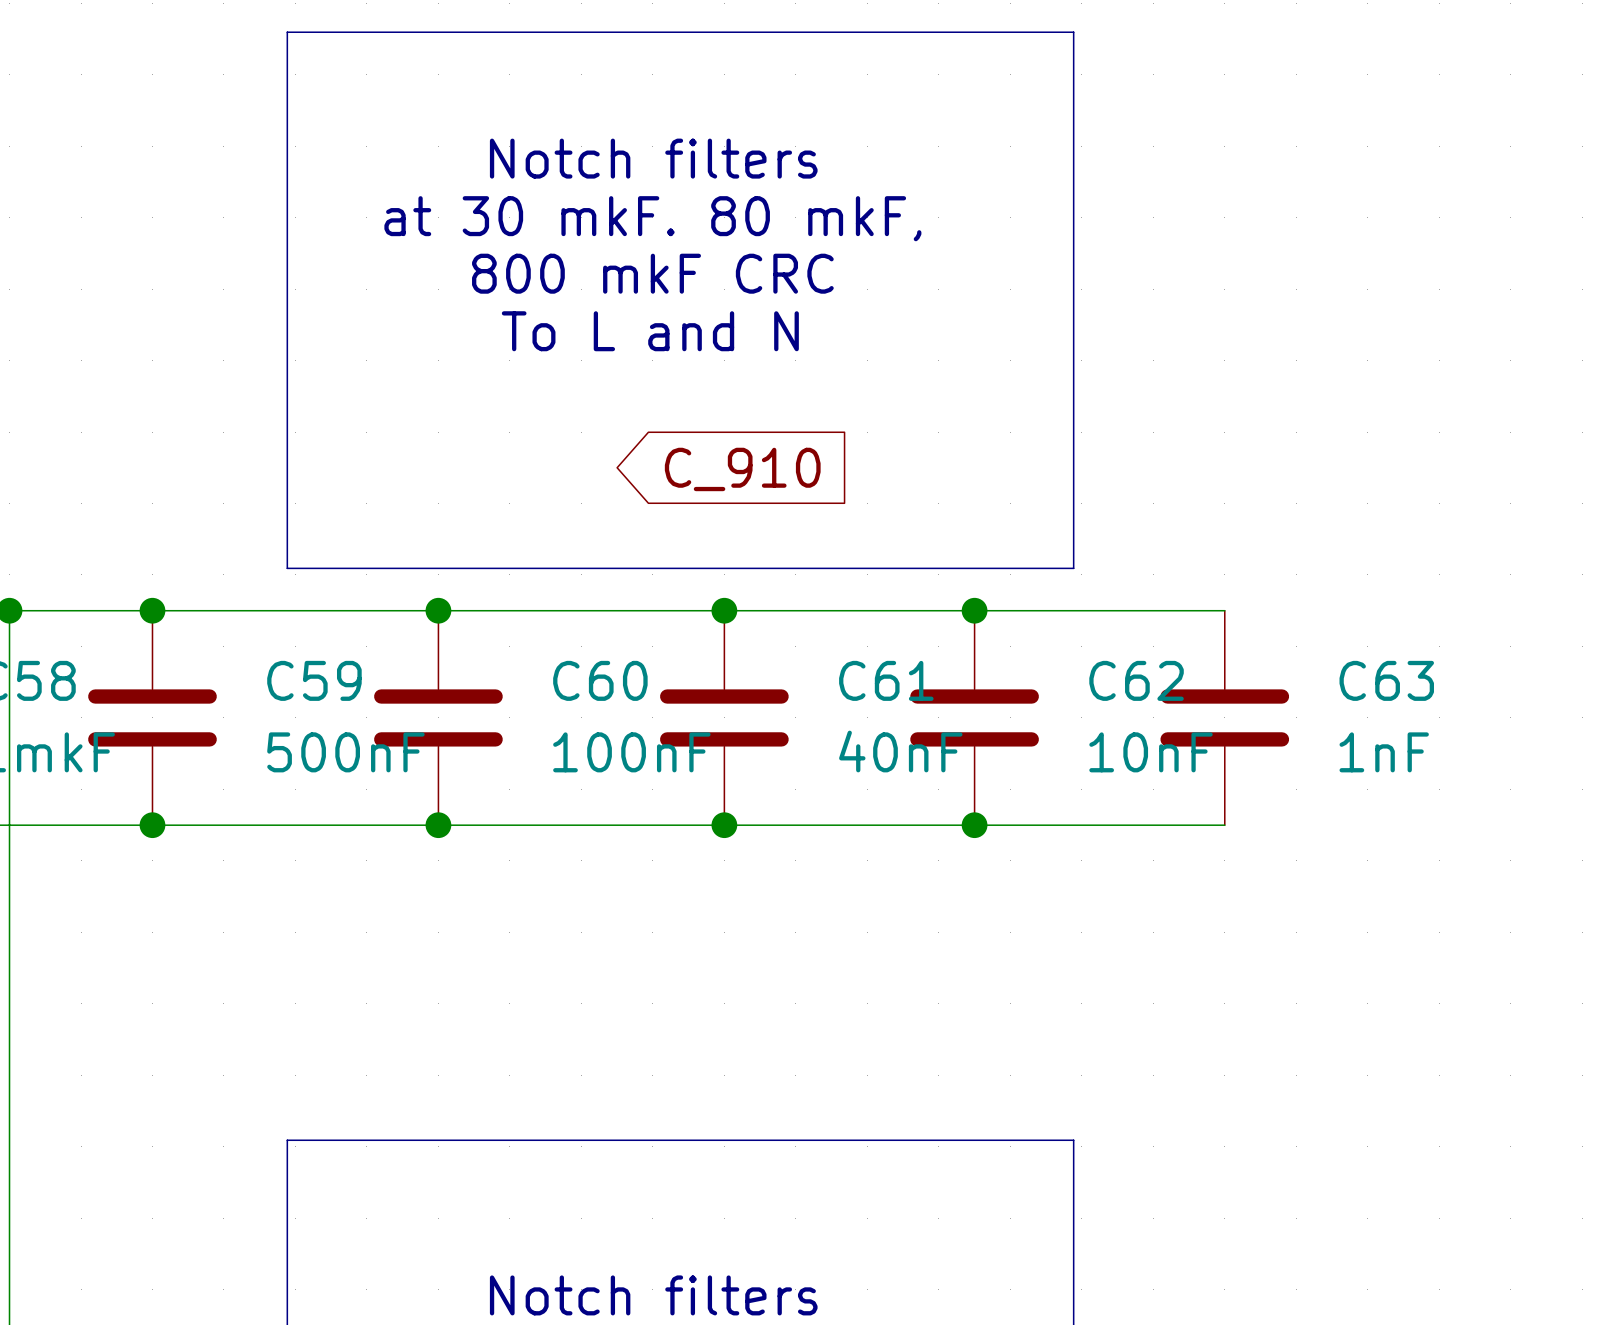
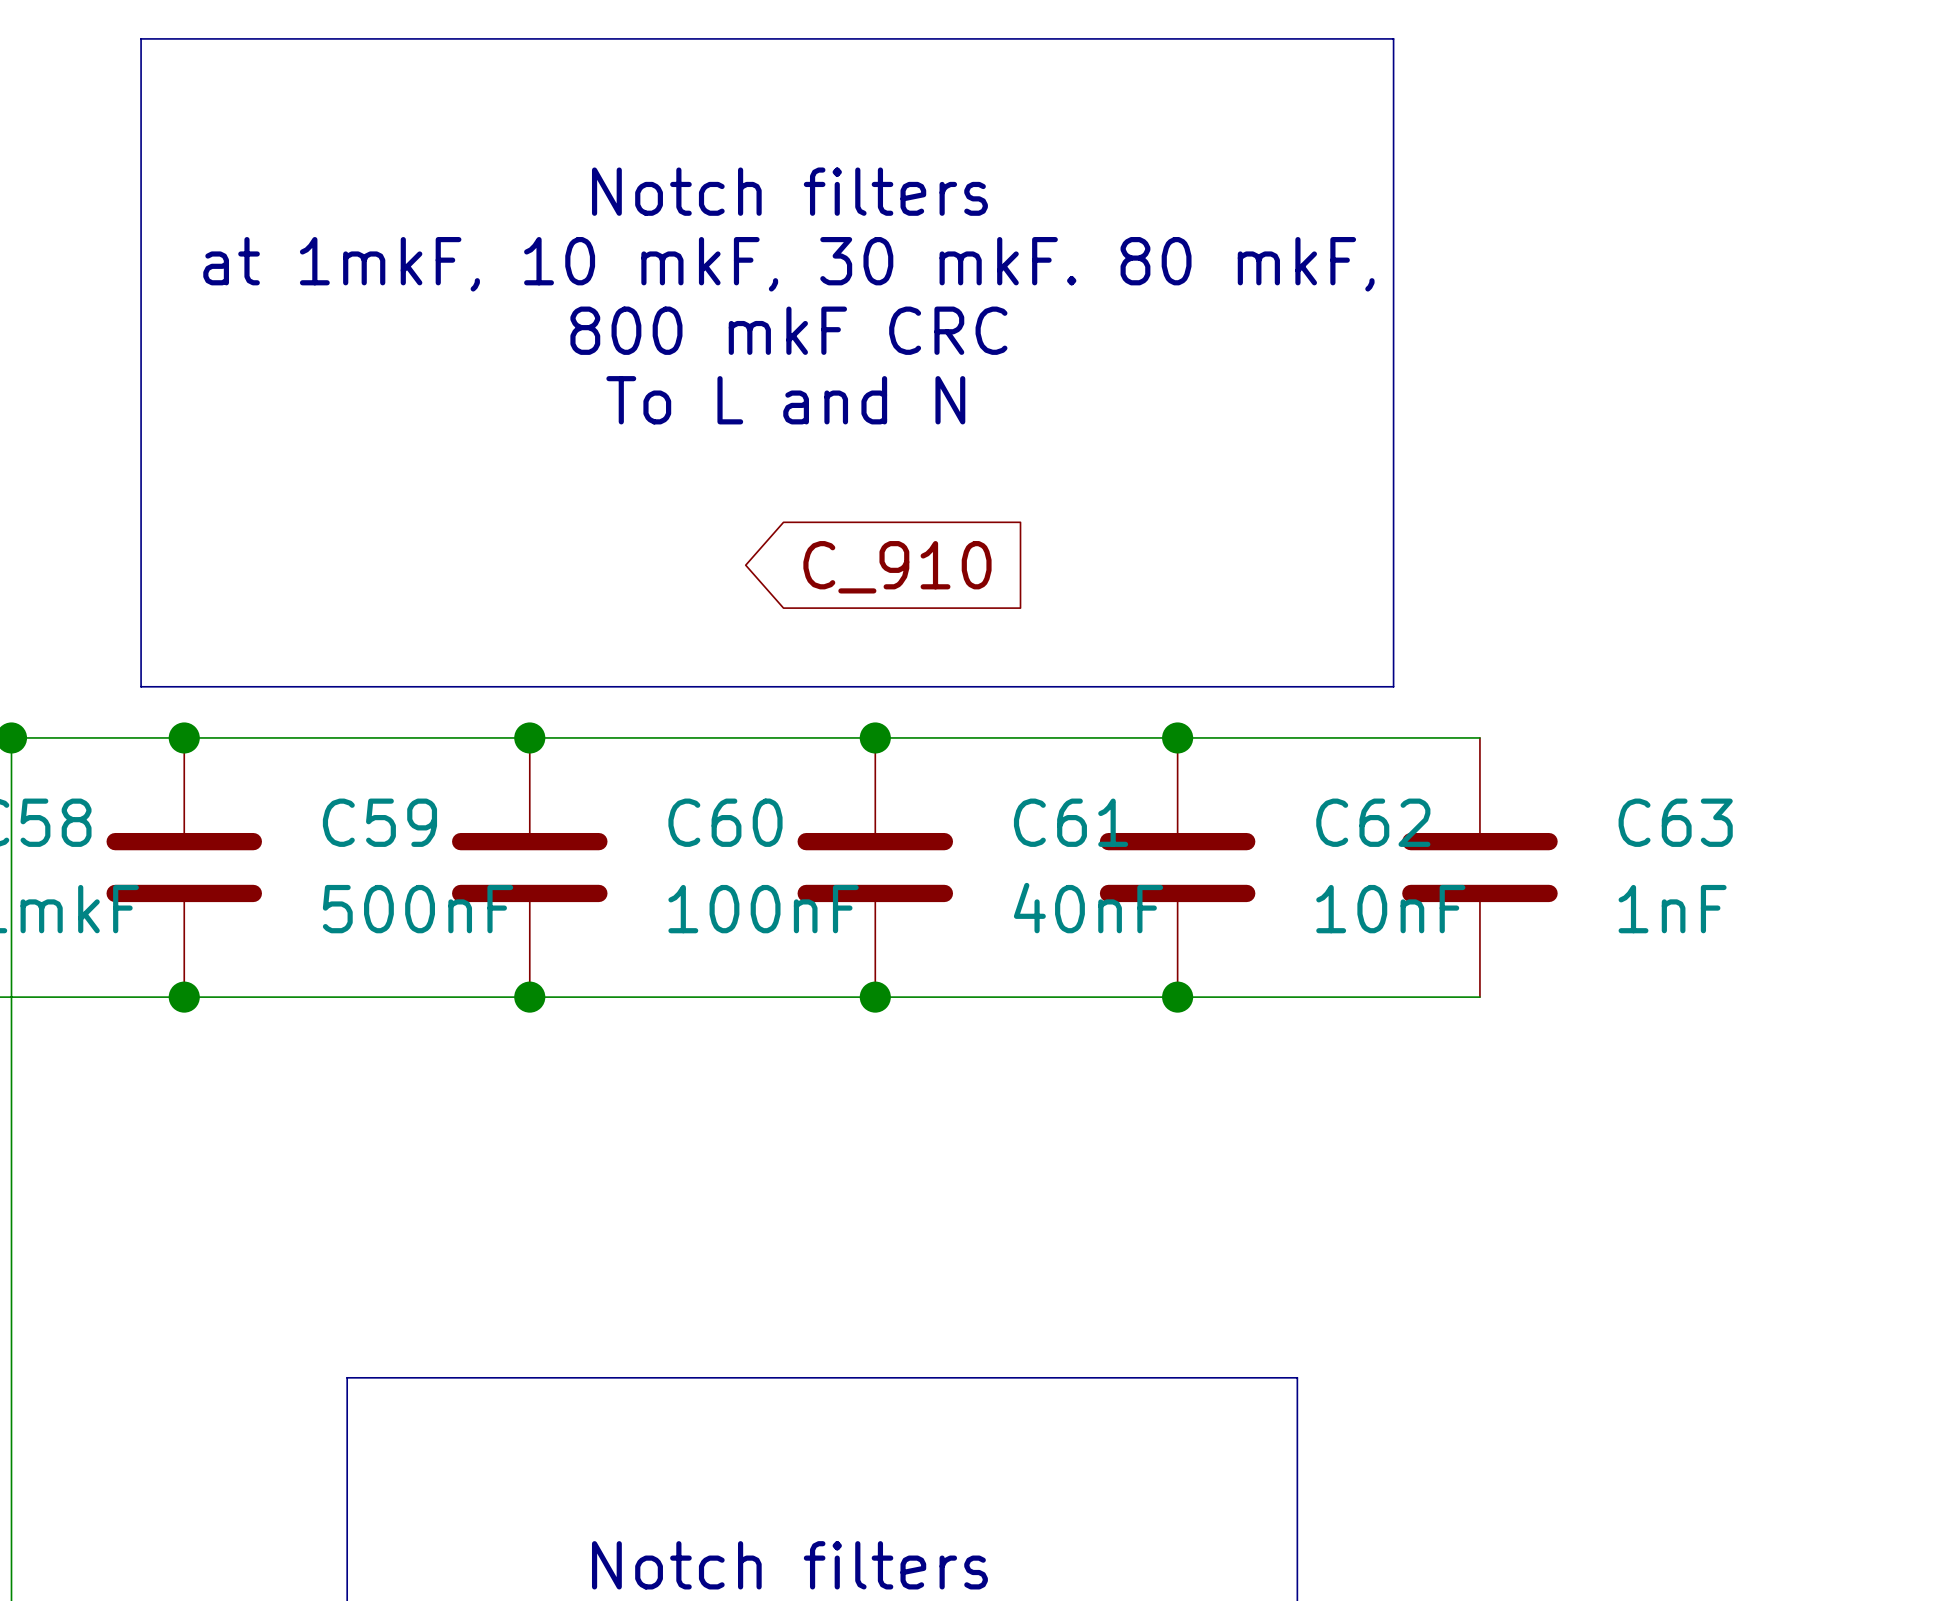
line: (287, 32) (287, 568) -> (347, 38) (141, 38) (141, 686) (347, 686)
line: (1073, 32) (1073, 568) -> (1297, 38) (1393, 38) (1393, 686) (1297, 686)
text: at 30 mkF. 80 mkF, (652, 218) -> at 1mkF, 10 mkF, 30 mkF. 80 mkF, (788, 264)

